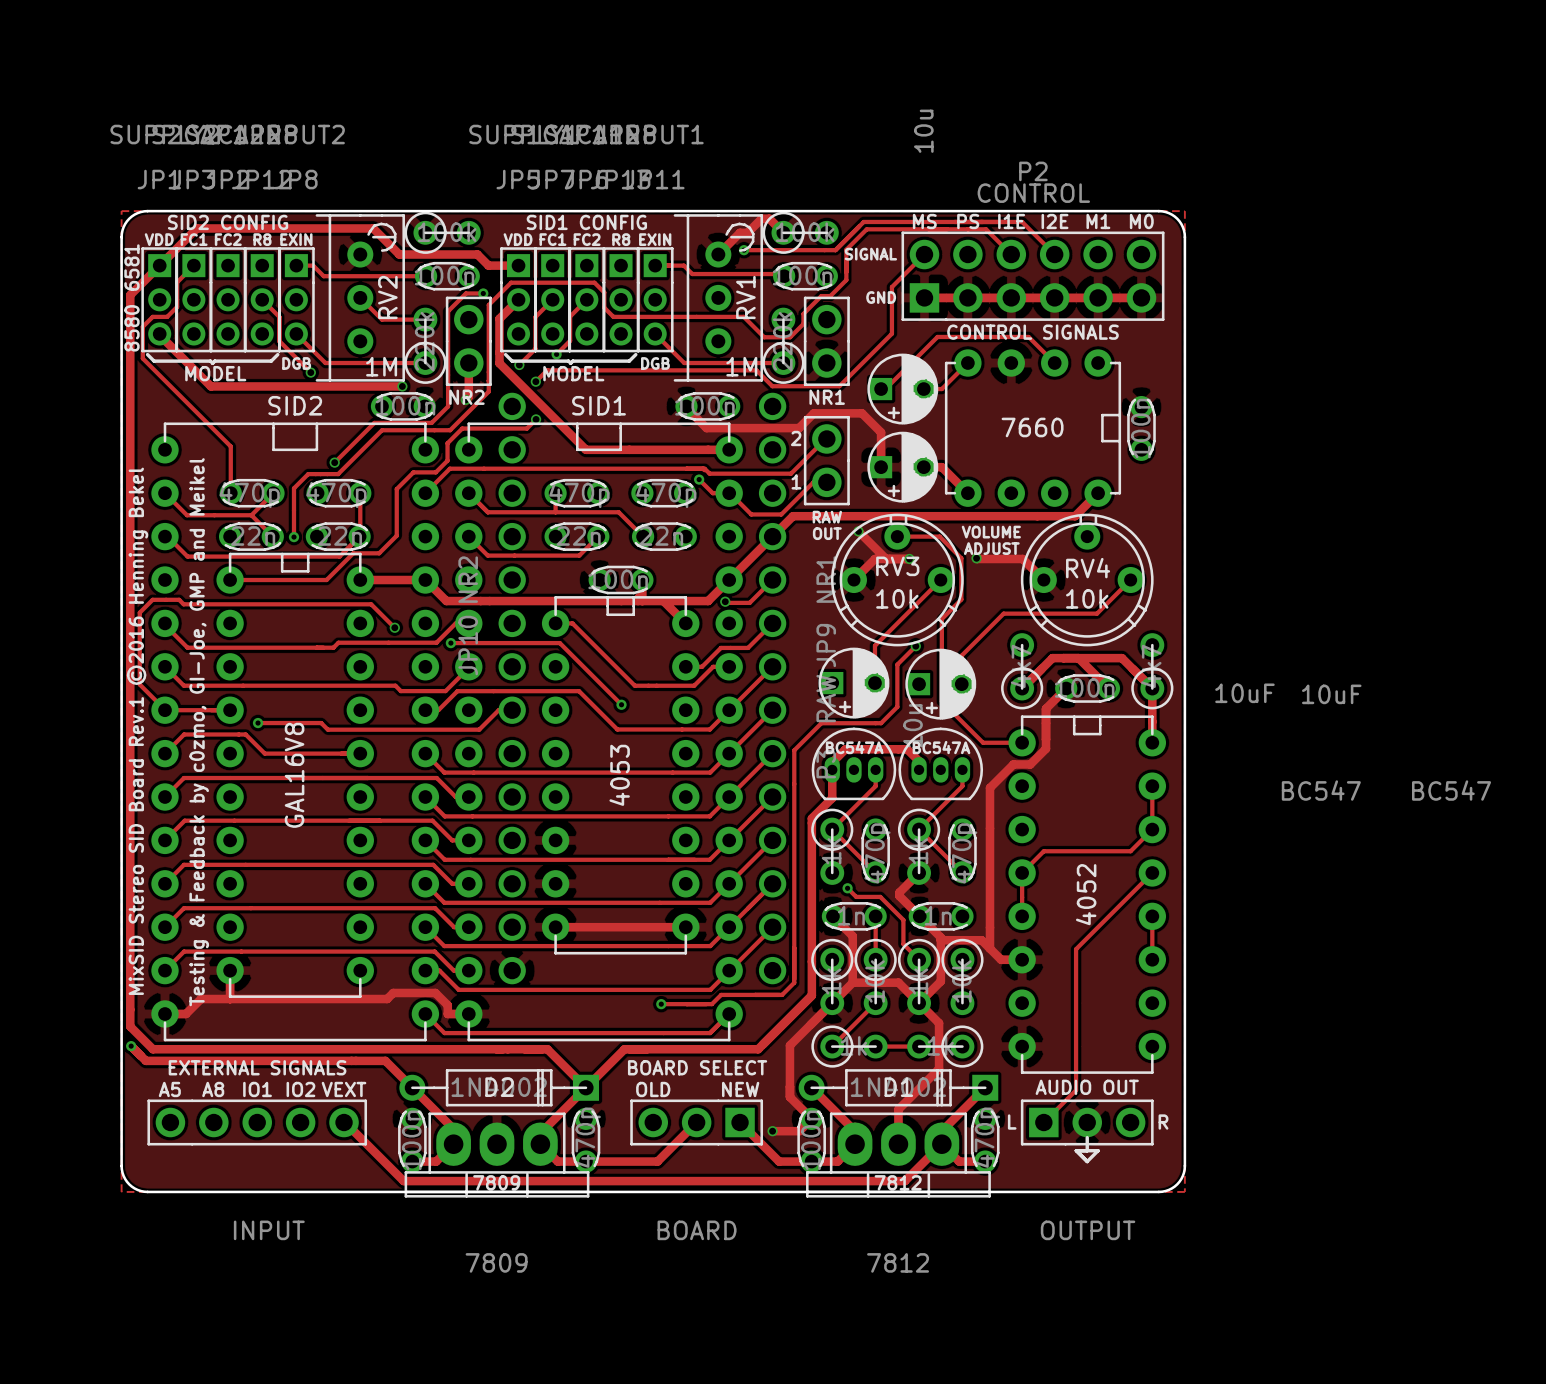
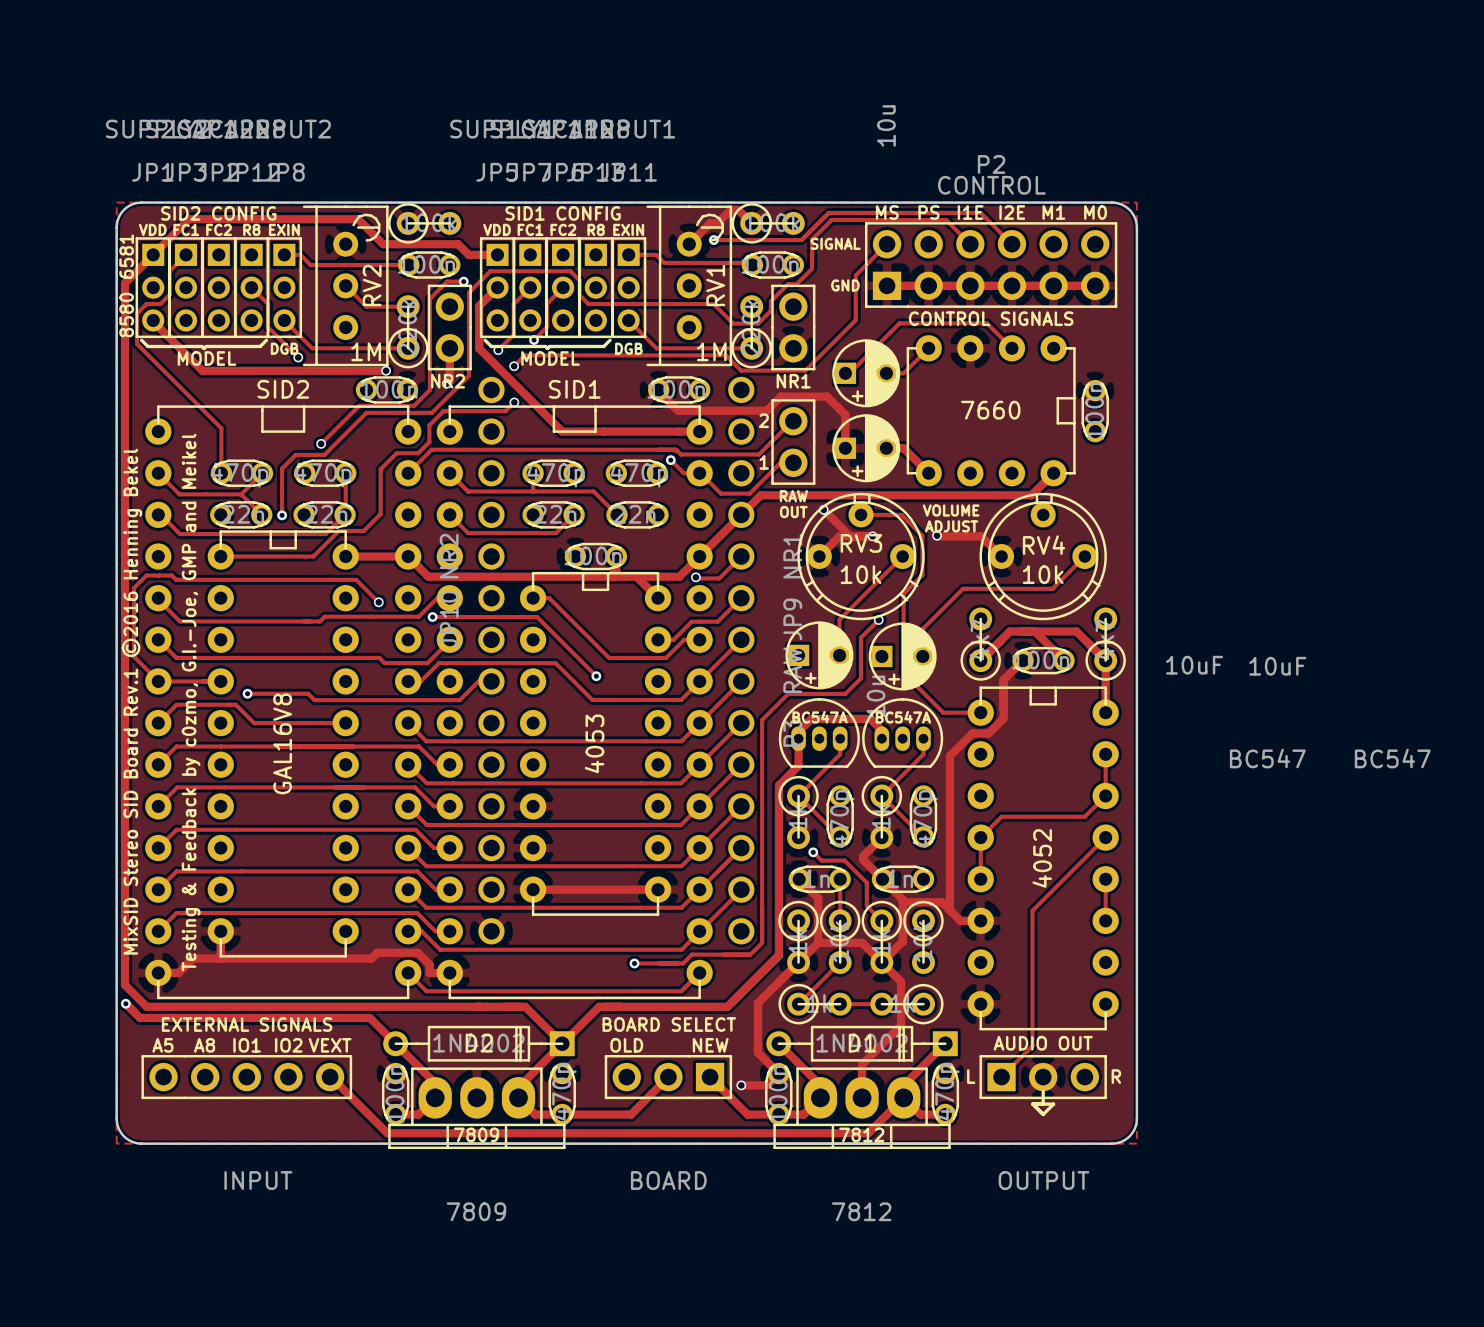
text: Testing & Feedback by c0zmo, GI-Joe, GMP and Meikel (199, 732) -> Testing & Feedback by c0zmo, G.I.-Joe, GMP and Meikel (191, 702)

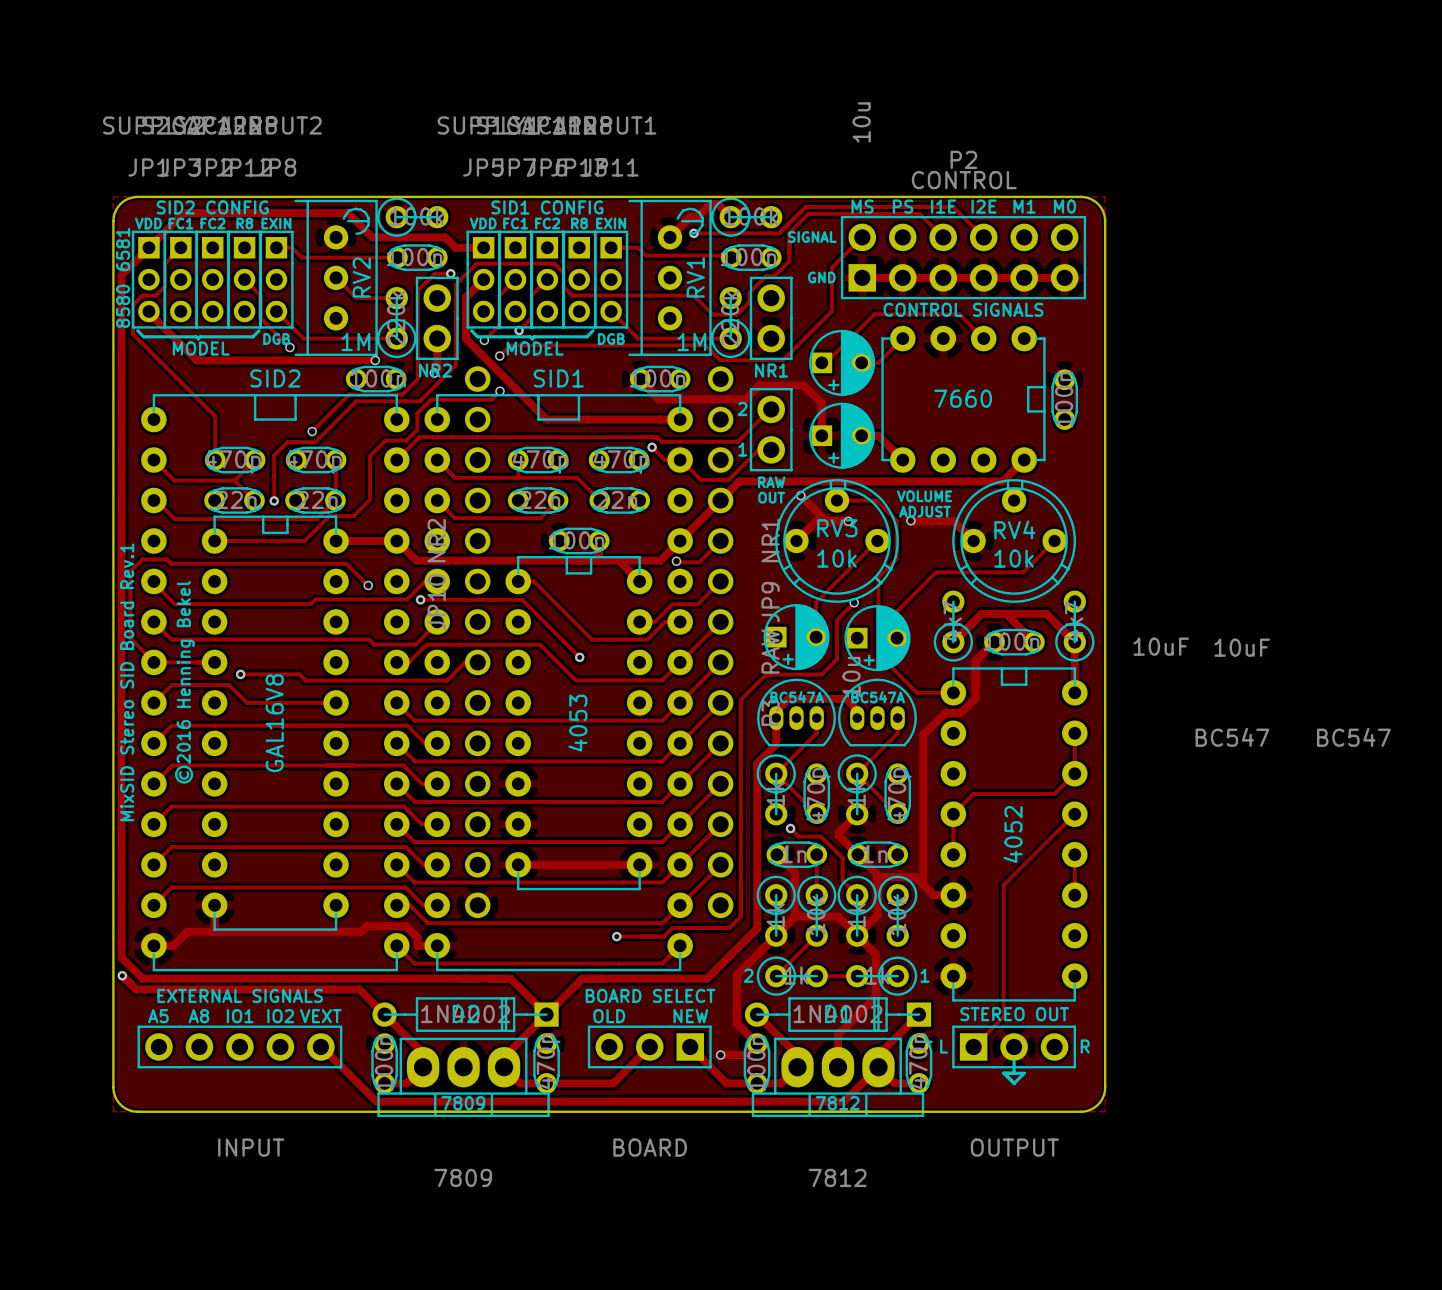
text: MixSID Stereo SID Board Rev.1 ©2016 Henning Bekel (131, 701) -> MixSID Stereo SID Board Rev.1 (127, 682)
text: Testing & Feedback by c0zmo, G.I.-Joe, GMP and Meikel (191, 702) -> ©2016 Henning Bekel (184, 682)
text: none -> 2 (748, 975)
text: none -> 1 (925, 975)
text: AUDIO OUT (1043, 1043) -> STEREO OUT (1014, 1014)

